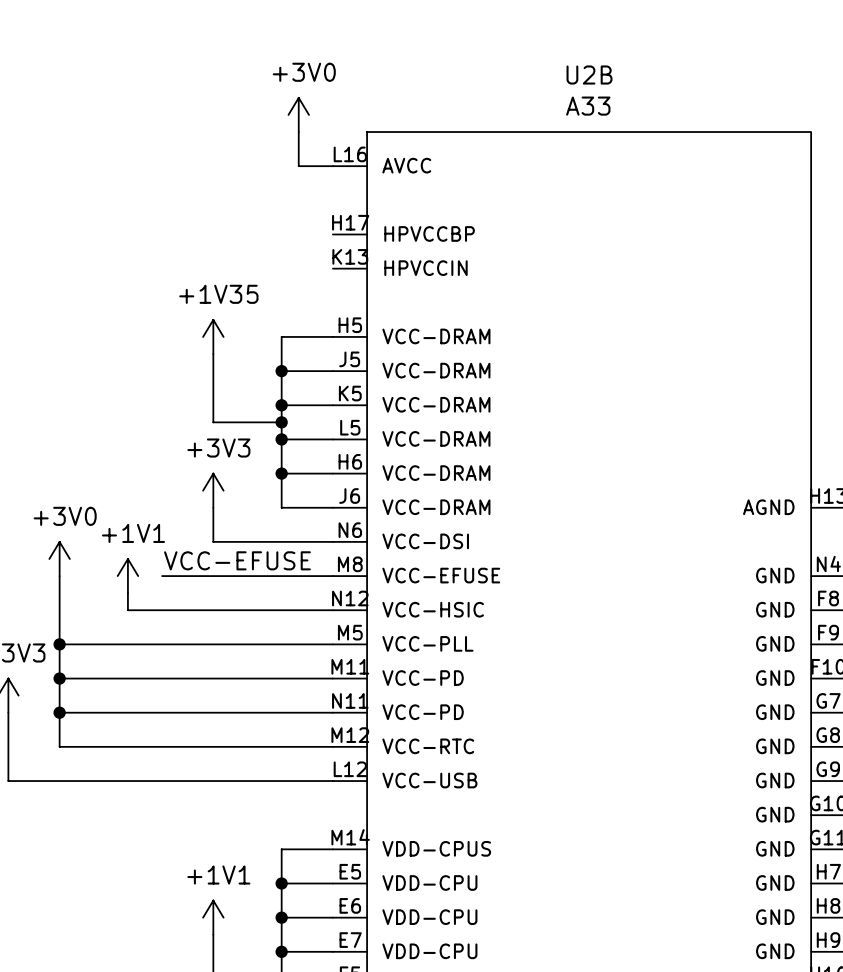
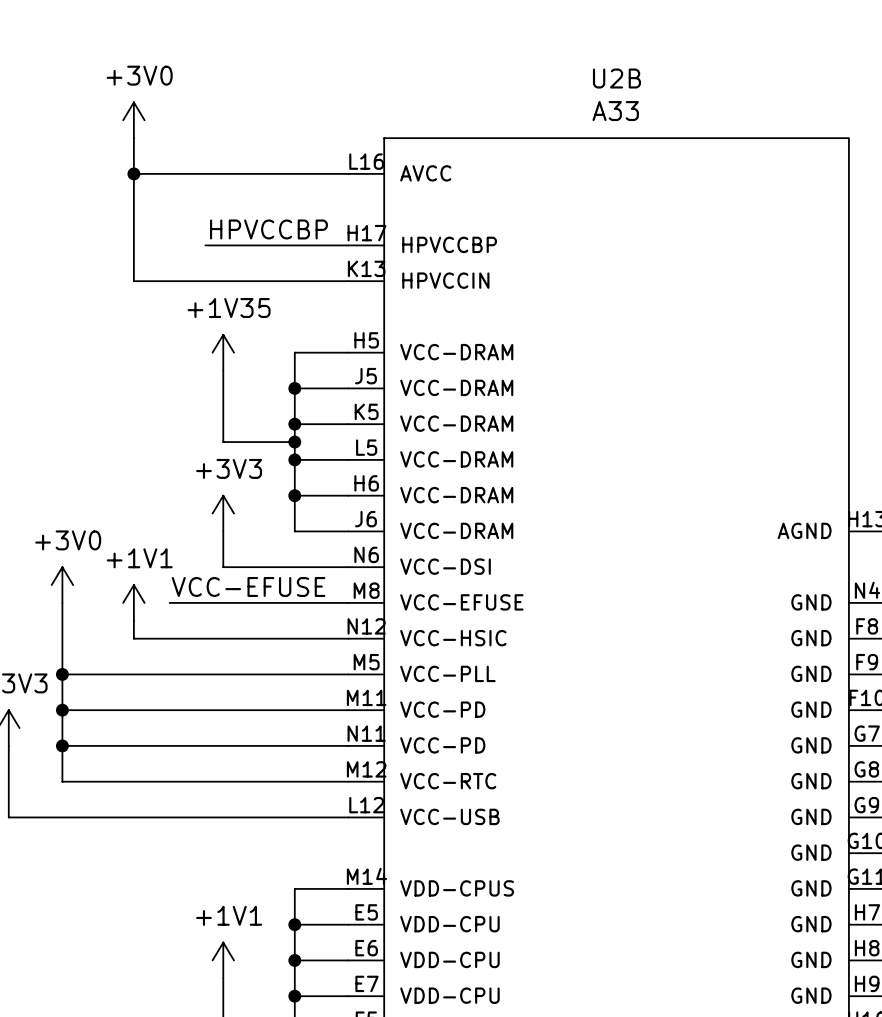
power symbol position: +3V0 (298, 114) -> +3V0 (133, 120)
wire: none -> (133, 138) (133, 281) (348, 281)
wire: (298, 132) (298, 166) -> (133, 173) (312, 173)
junction: none -> (133, 173)
label: none -> HPVCCBP (268, 229)
wire: none -> (205, 245) (348, 245)

